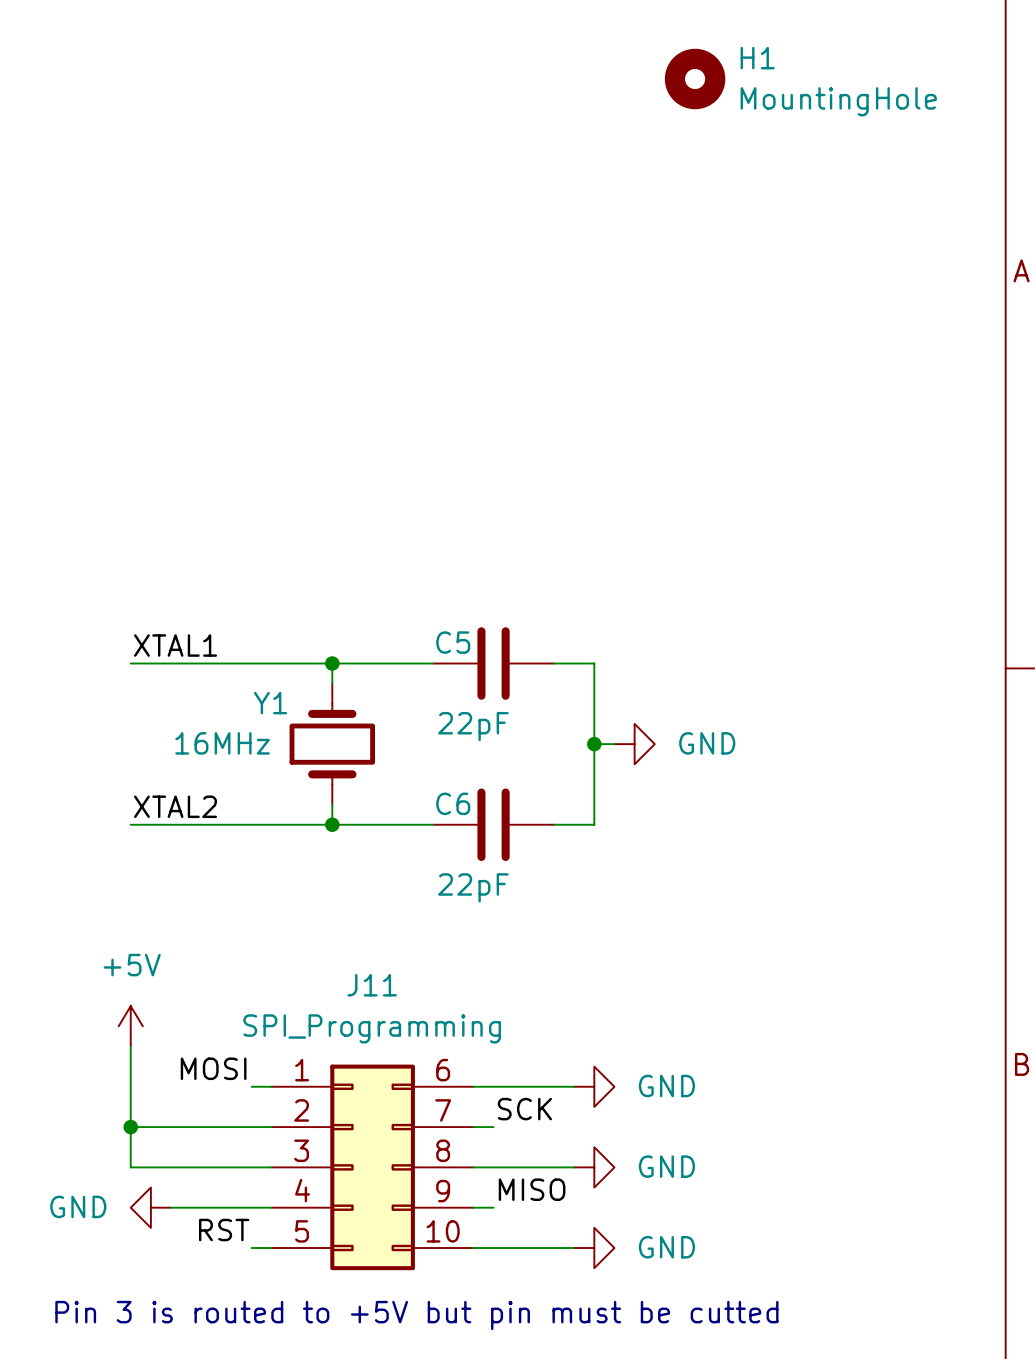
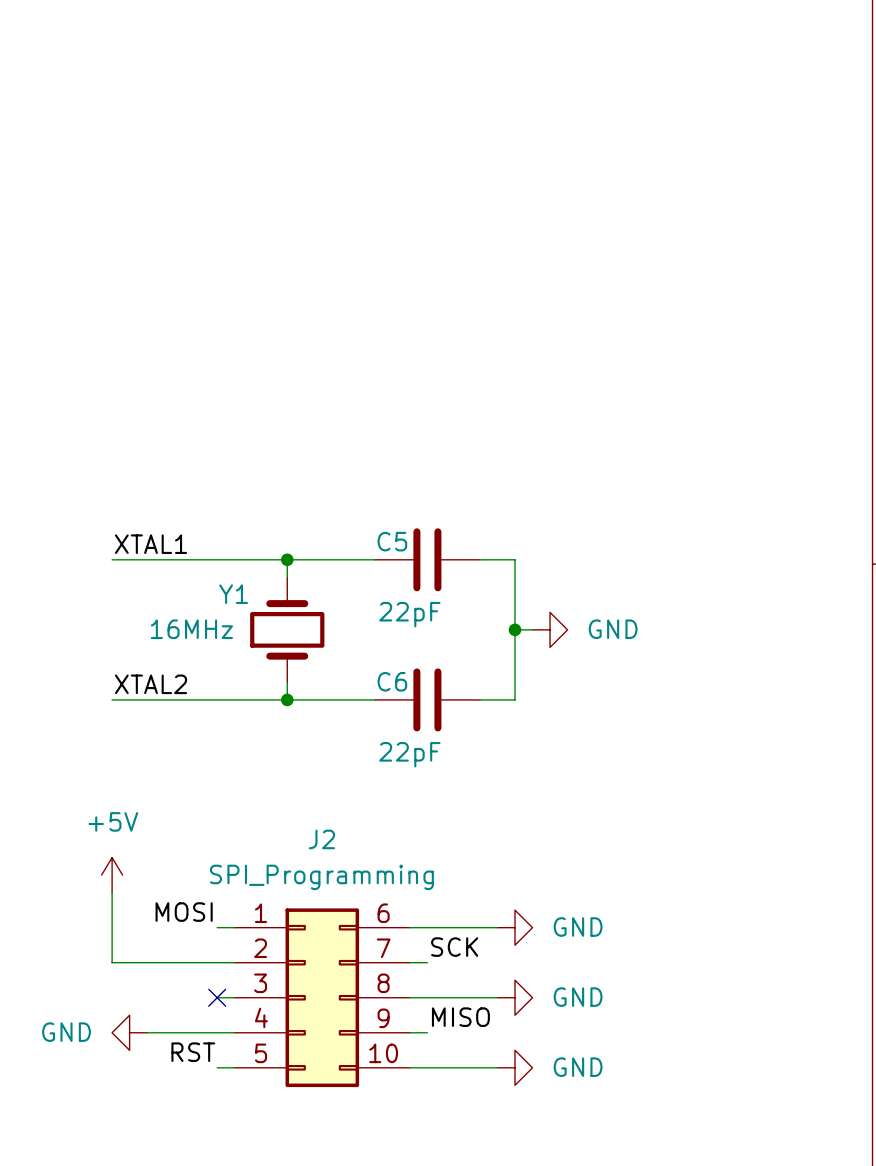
H1: MountingHole (695, 79) -> none
J11 name: J11 (372, 985) -> J2 (321, 839)
wire: (130, 1127) (130, 1167) (251, 1167) -> none
junction: (130, 1127) -> none
no-connect mark: none -> (217, 997)
text: Pin 3 is routed to +5V but pin must be cutted (416, 1315) -> none

